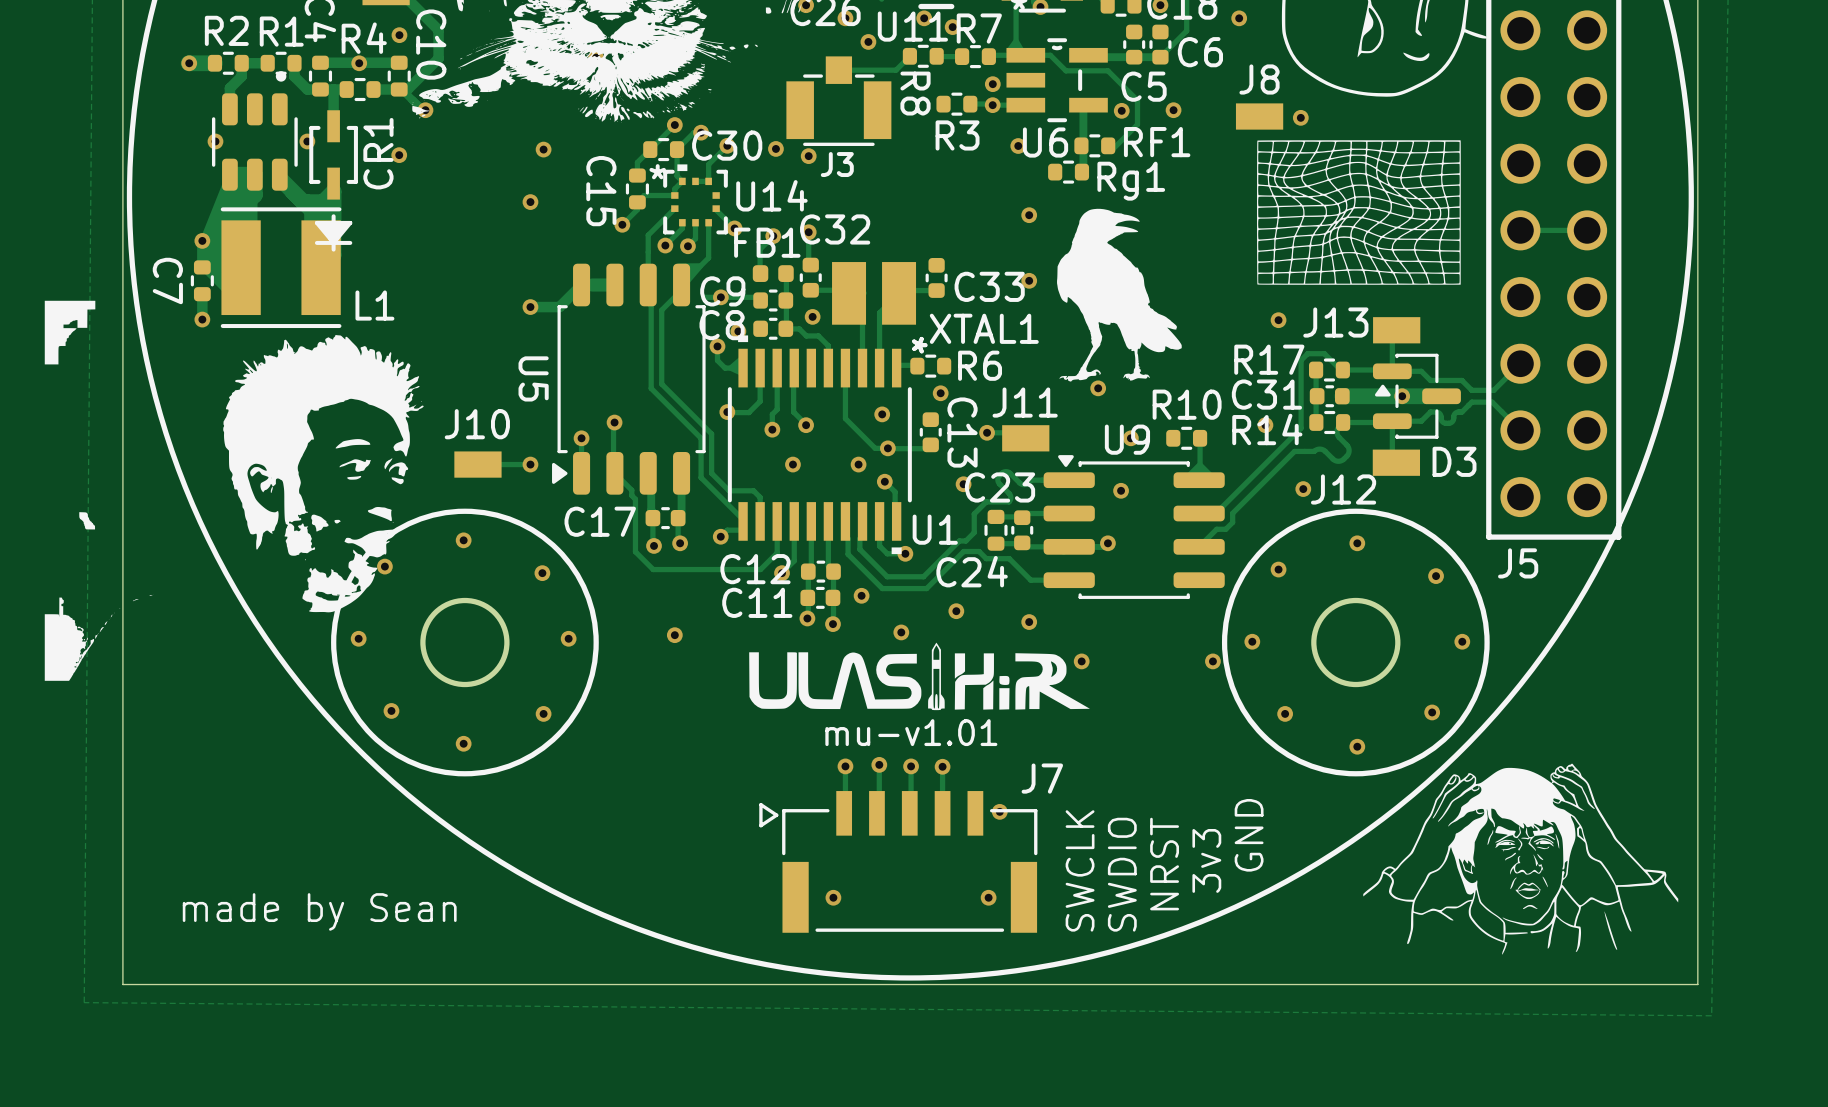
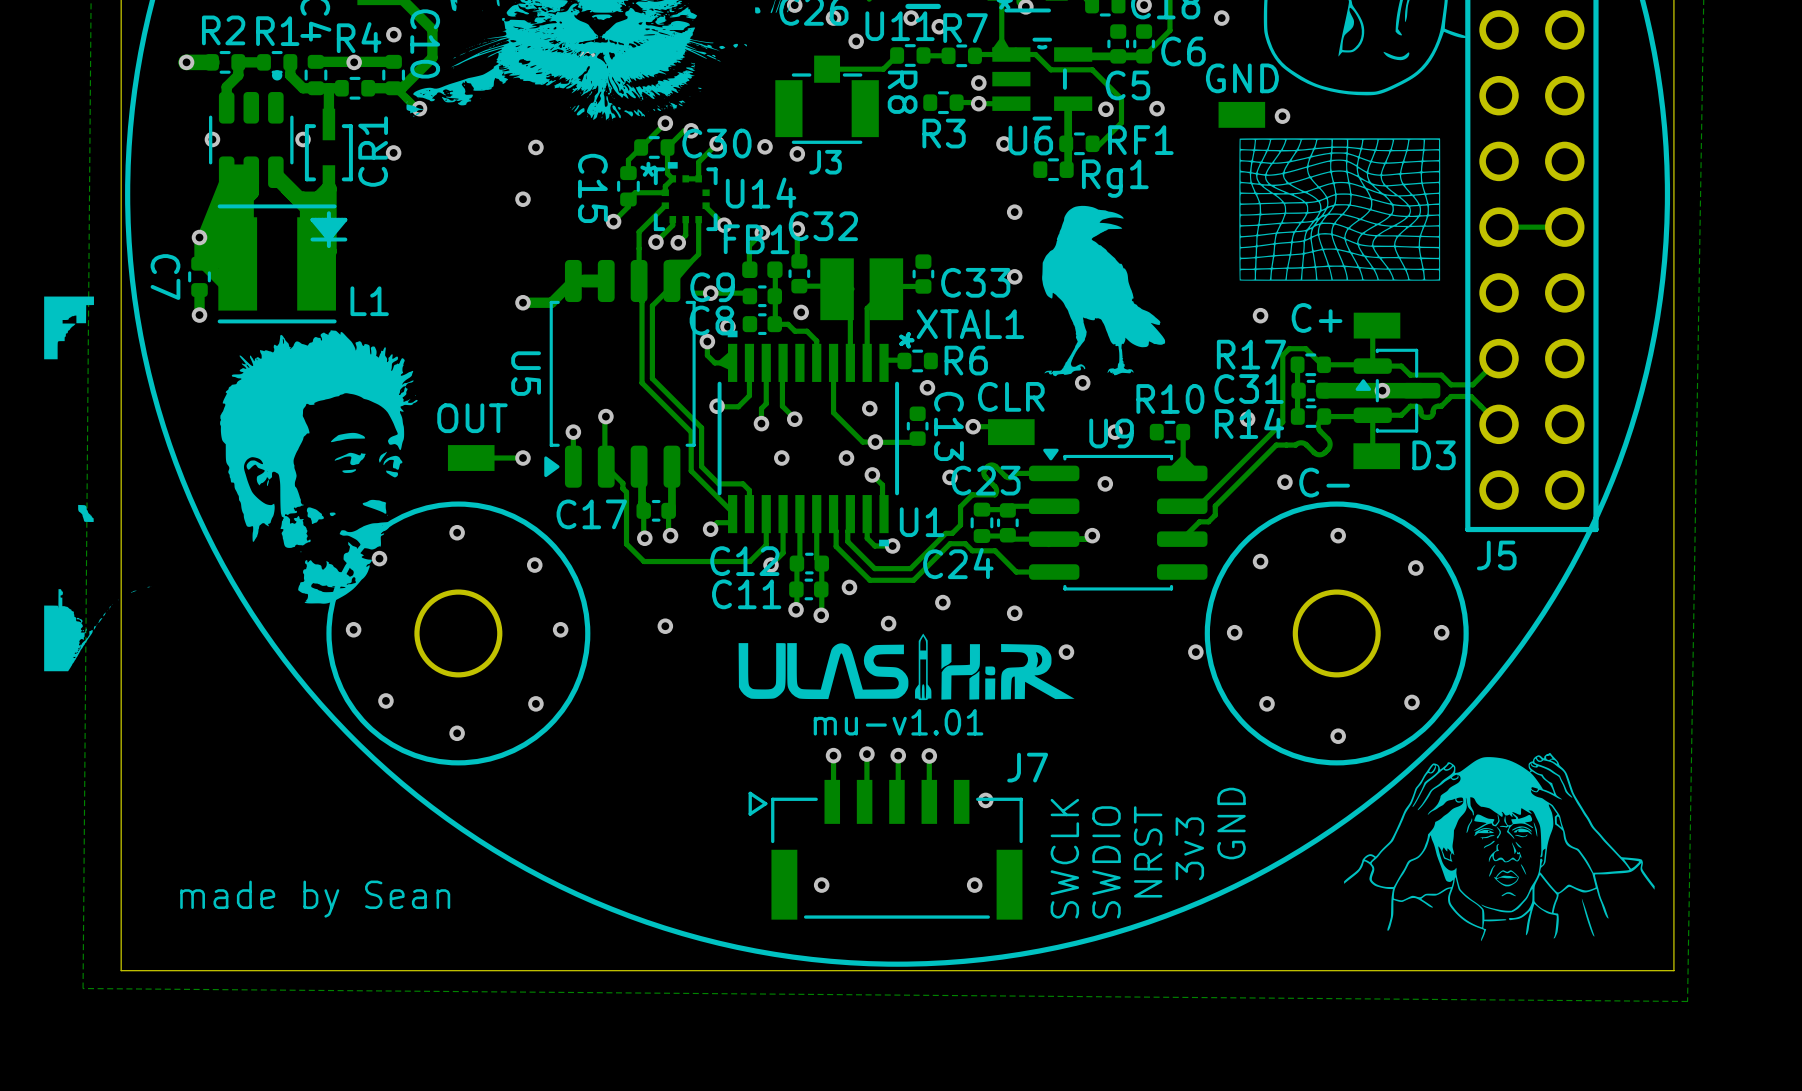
J8 name: J8 (1259, 79) -> GND (1242, 78)
J13 name: J13 (1335, 322) -> C+ (1317, 317)
J11 name: J11 (1025, 402) -> CLR (1011, 396)
J10 name: J10 (477, 424) -> OUT (472, 418)
J12 name: J12 (1343, 489) -> C- (1324, 482)

